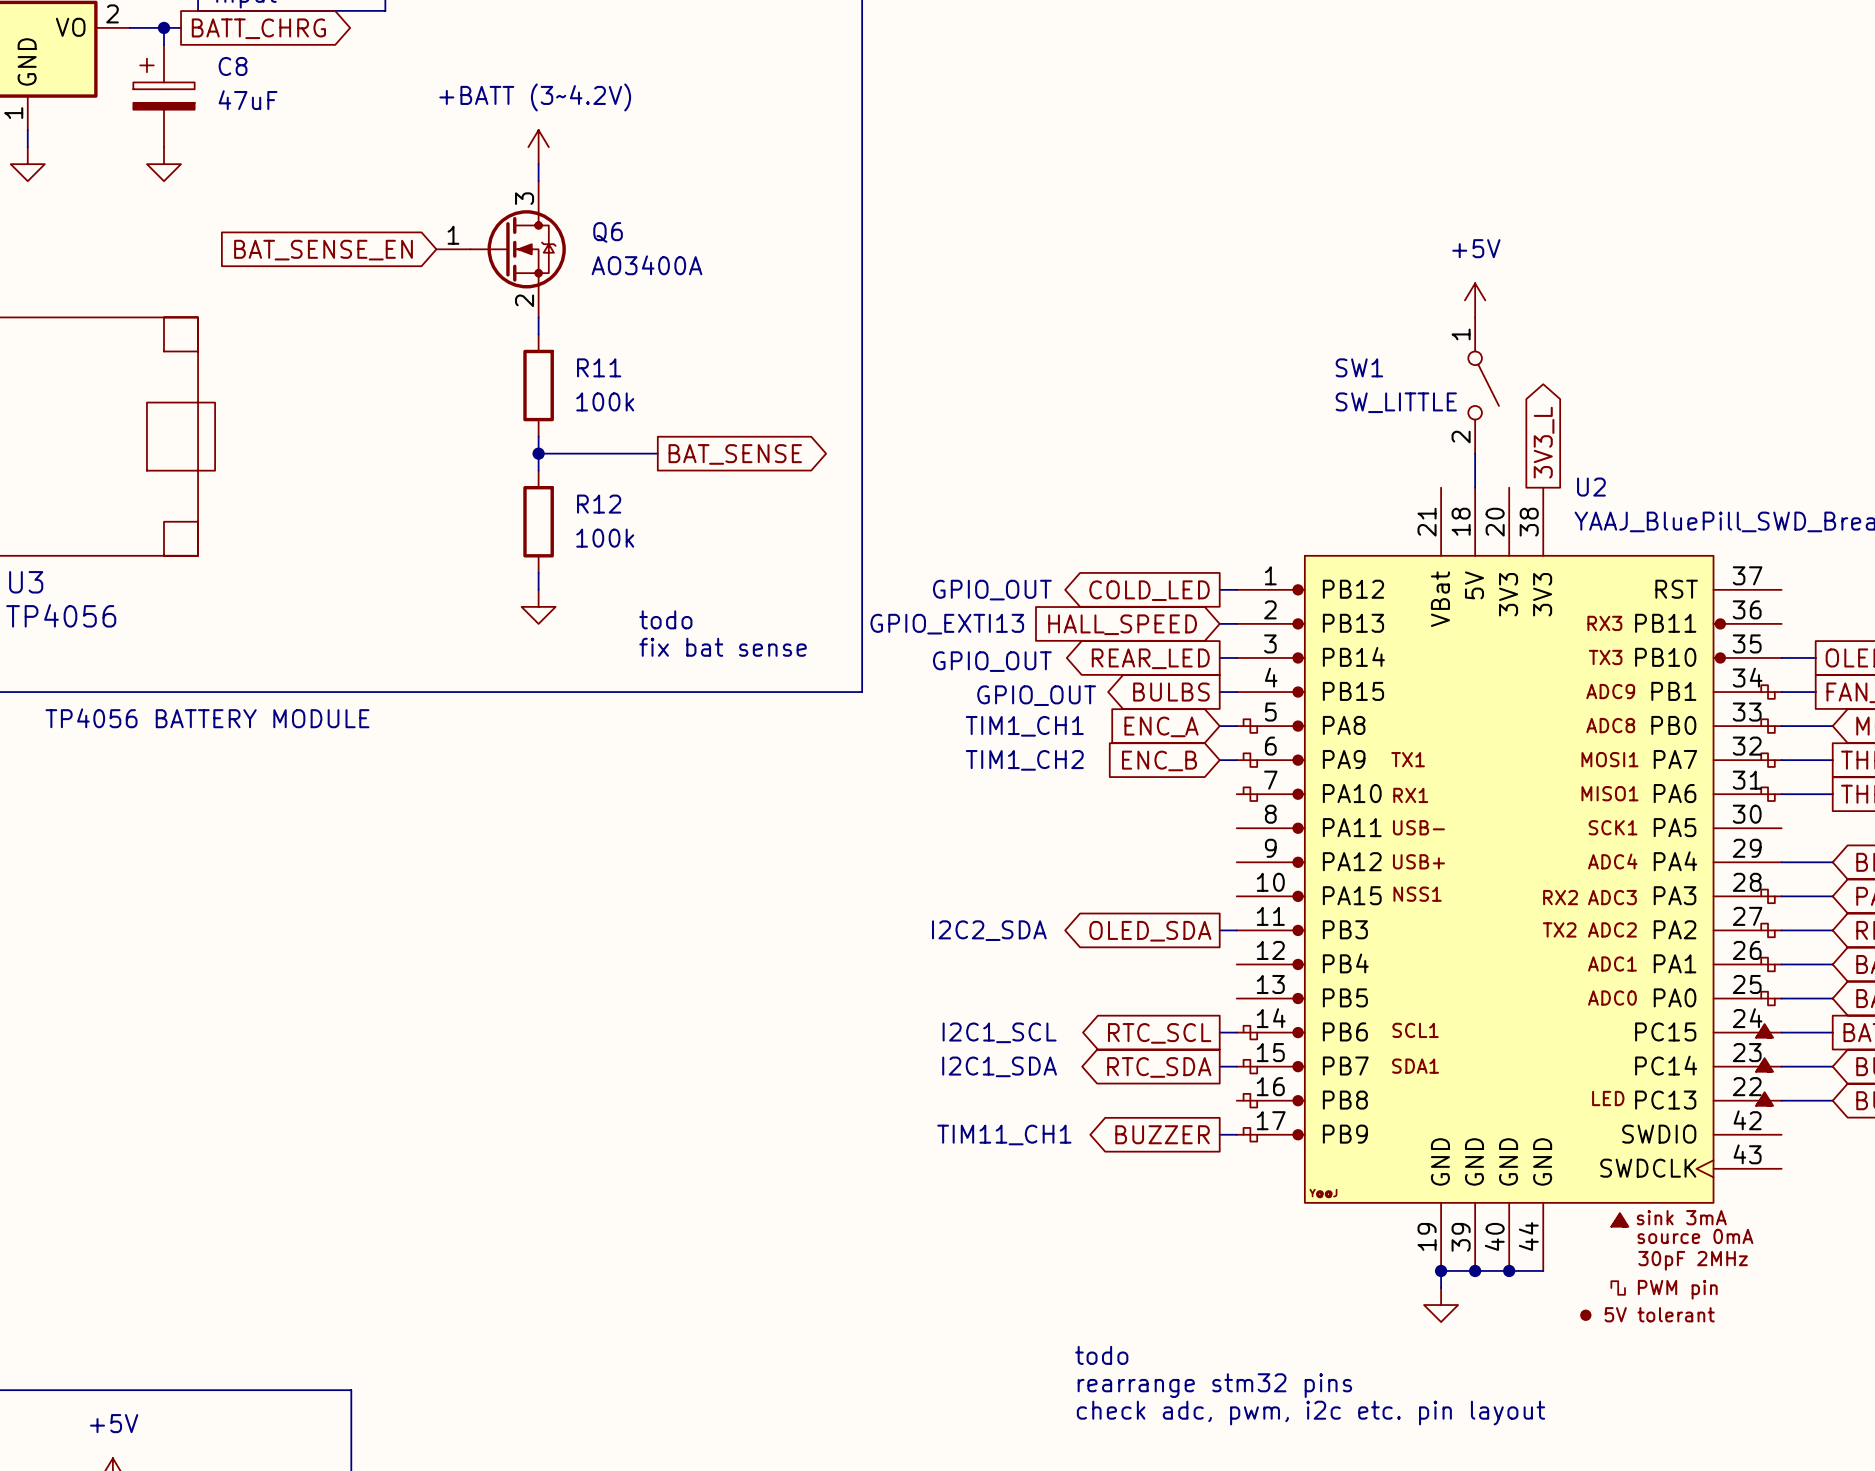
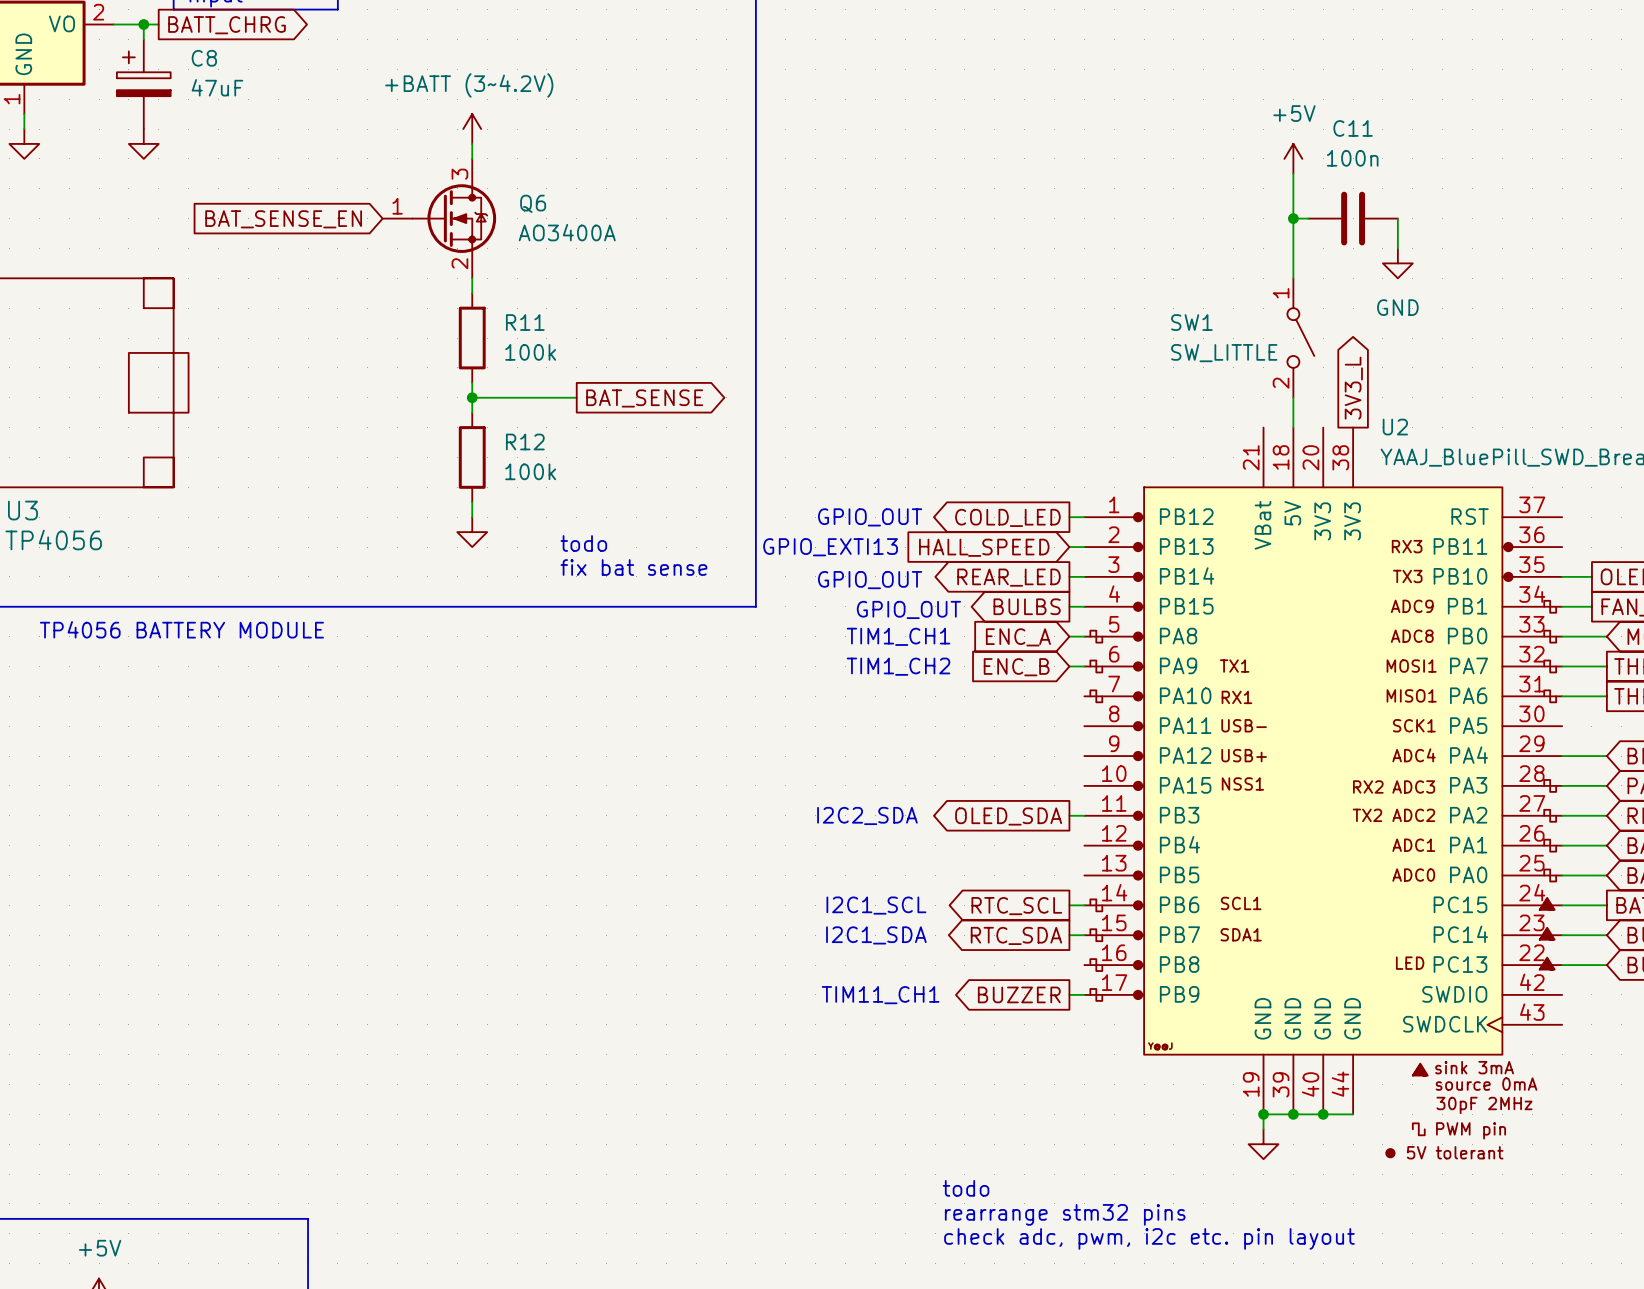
wire: none -> (1293, 173) (1293, 278)
wire: none -> (1293, 218) (1308, 218)
junction: none -> (1293, 218)
C11: none -> 100n (1353, 218)
wire: none -> (1397, 218) (1397, 248)
power symbol position: +5V (1475, 300) -> +5V (1293, 158)
power symbol: none -> GND (1397, 263)

